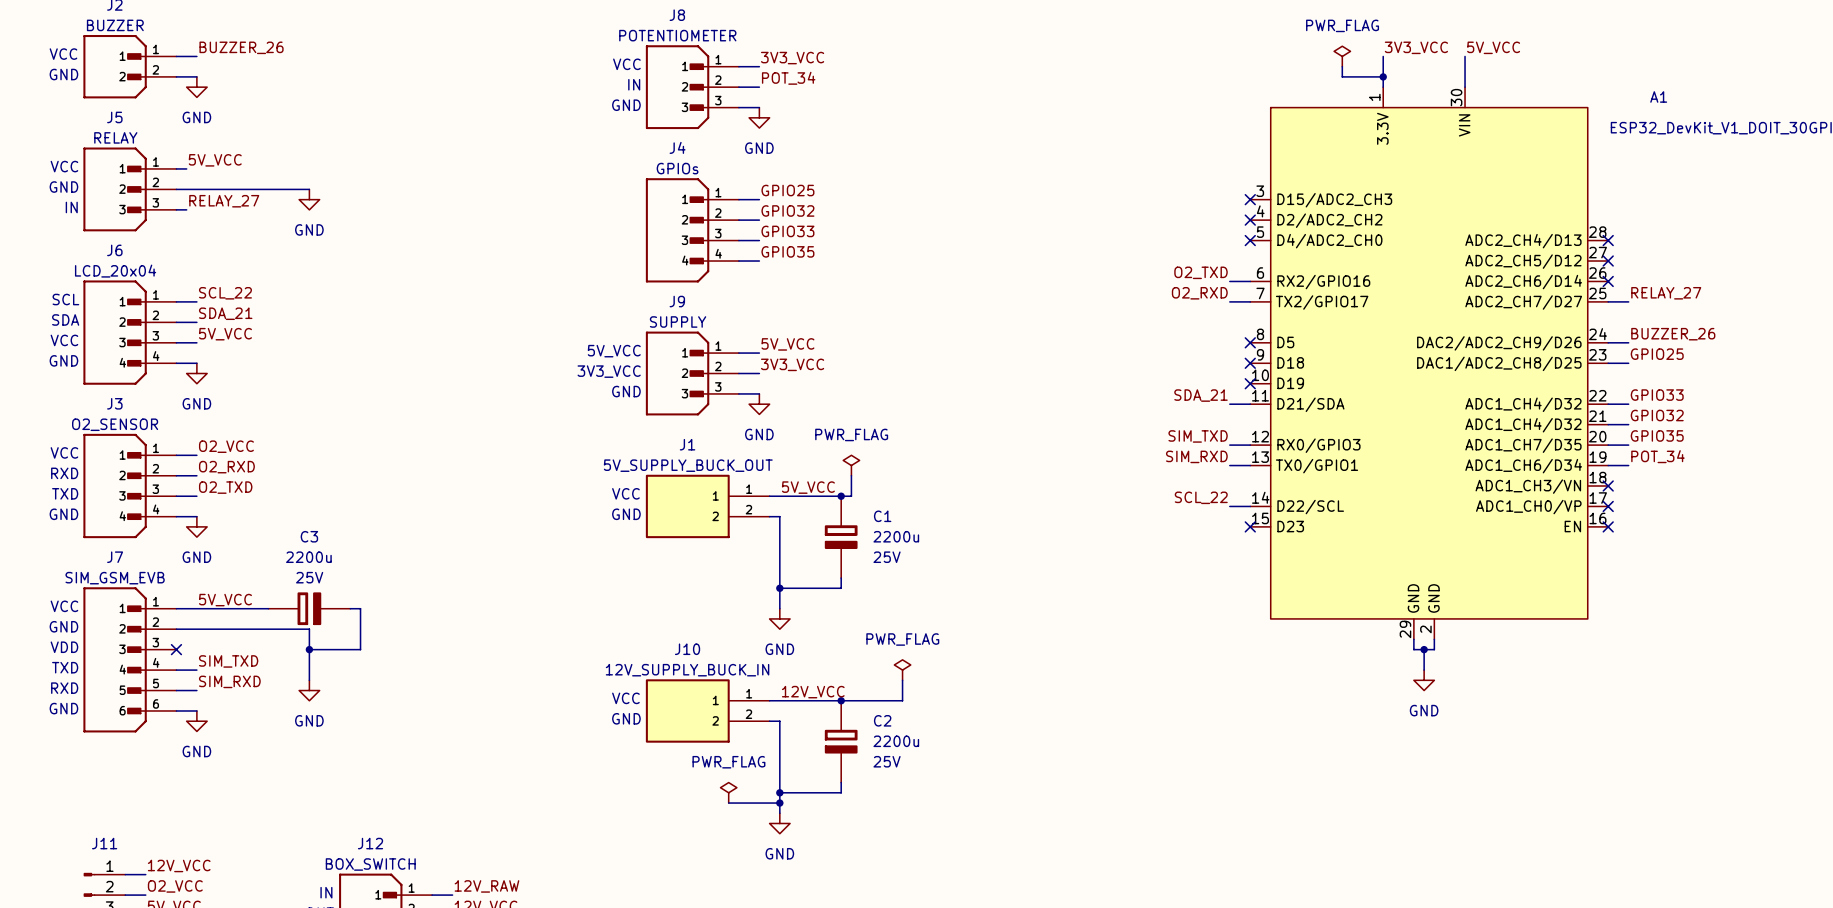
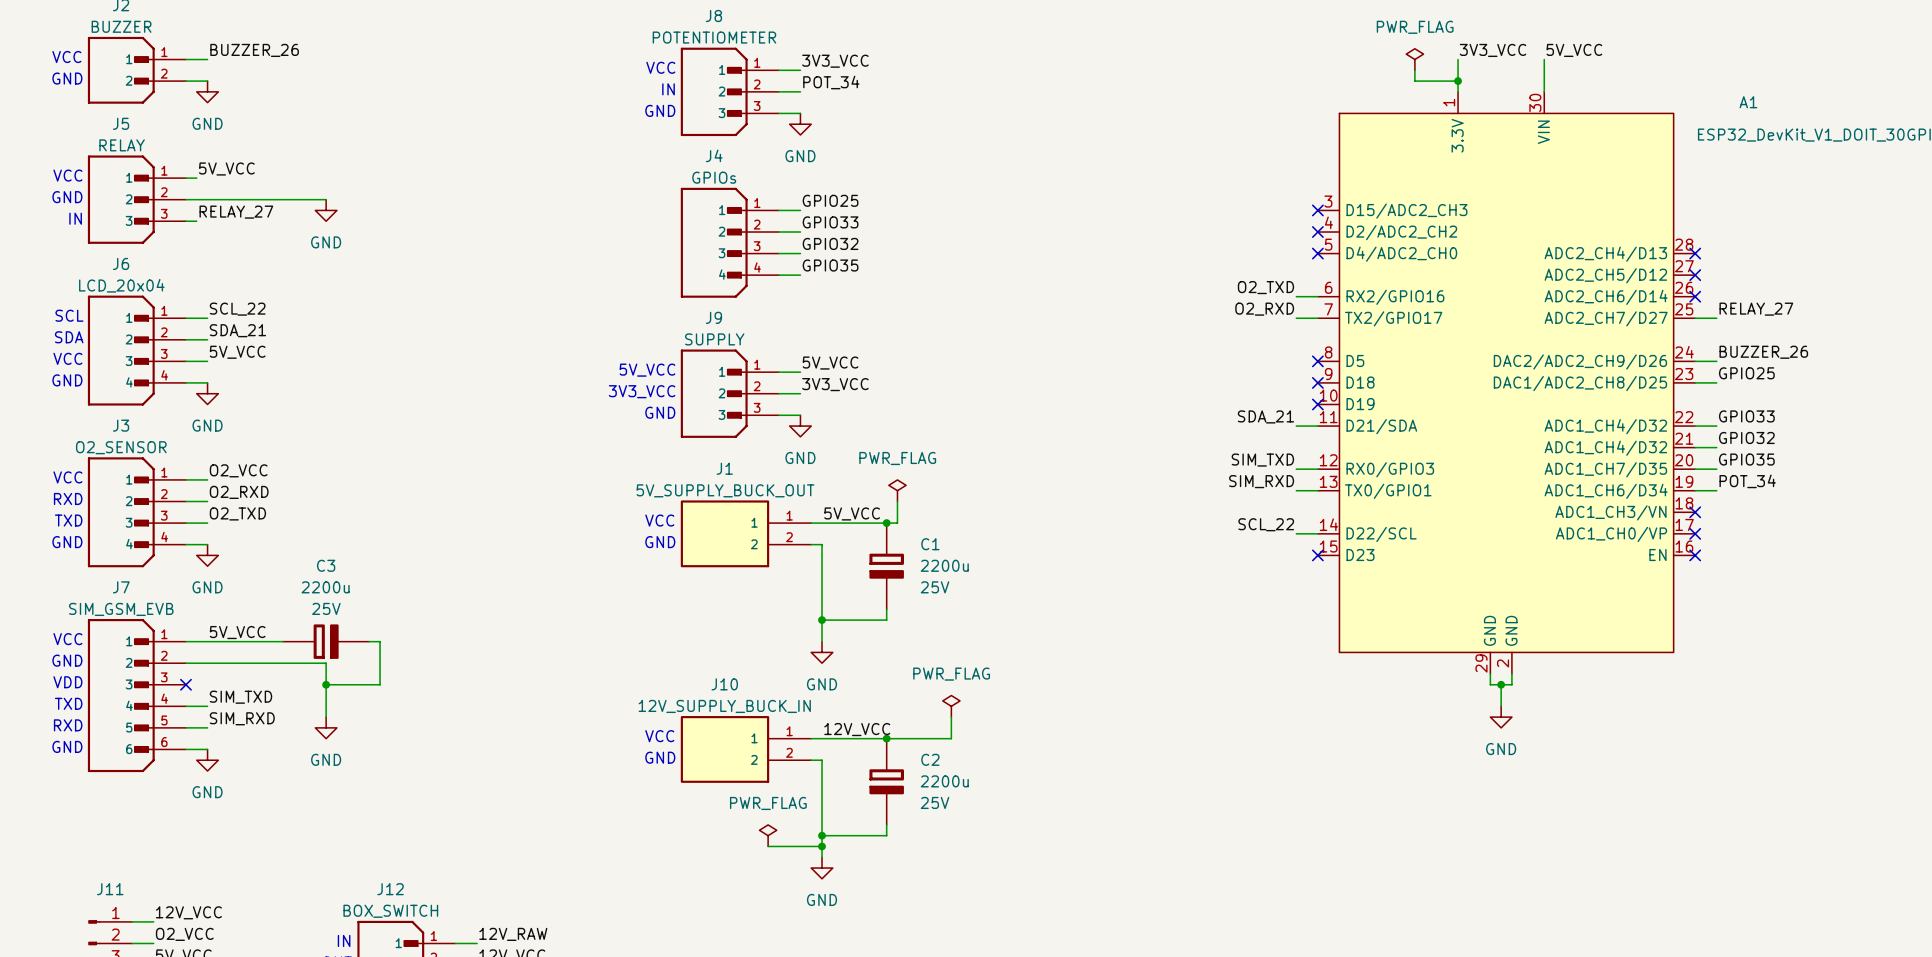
label: GPIO32 (787, 210) -> GPIO33 (830, 222)
label: GPIO33 (787, 231) -> GPIO32 (830, 243)

